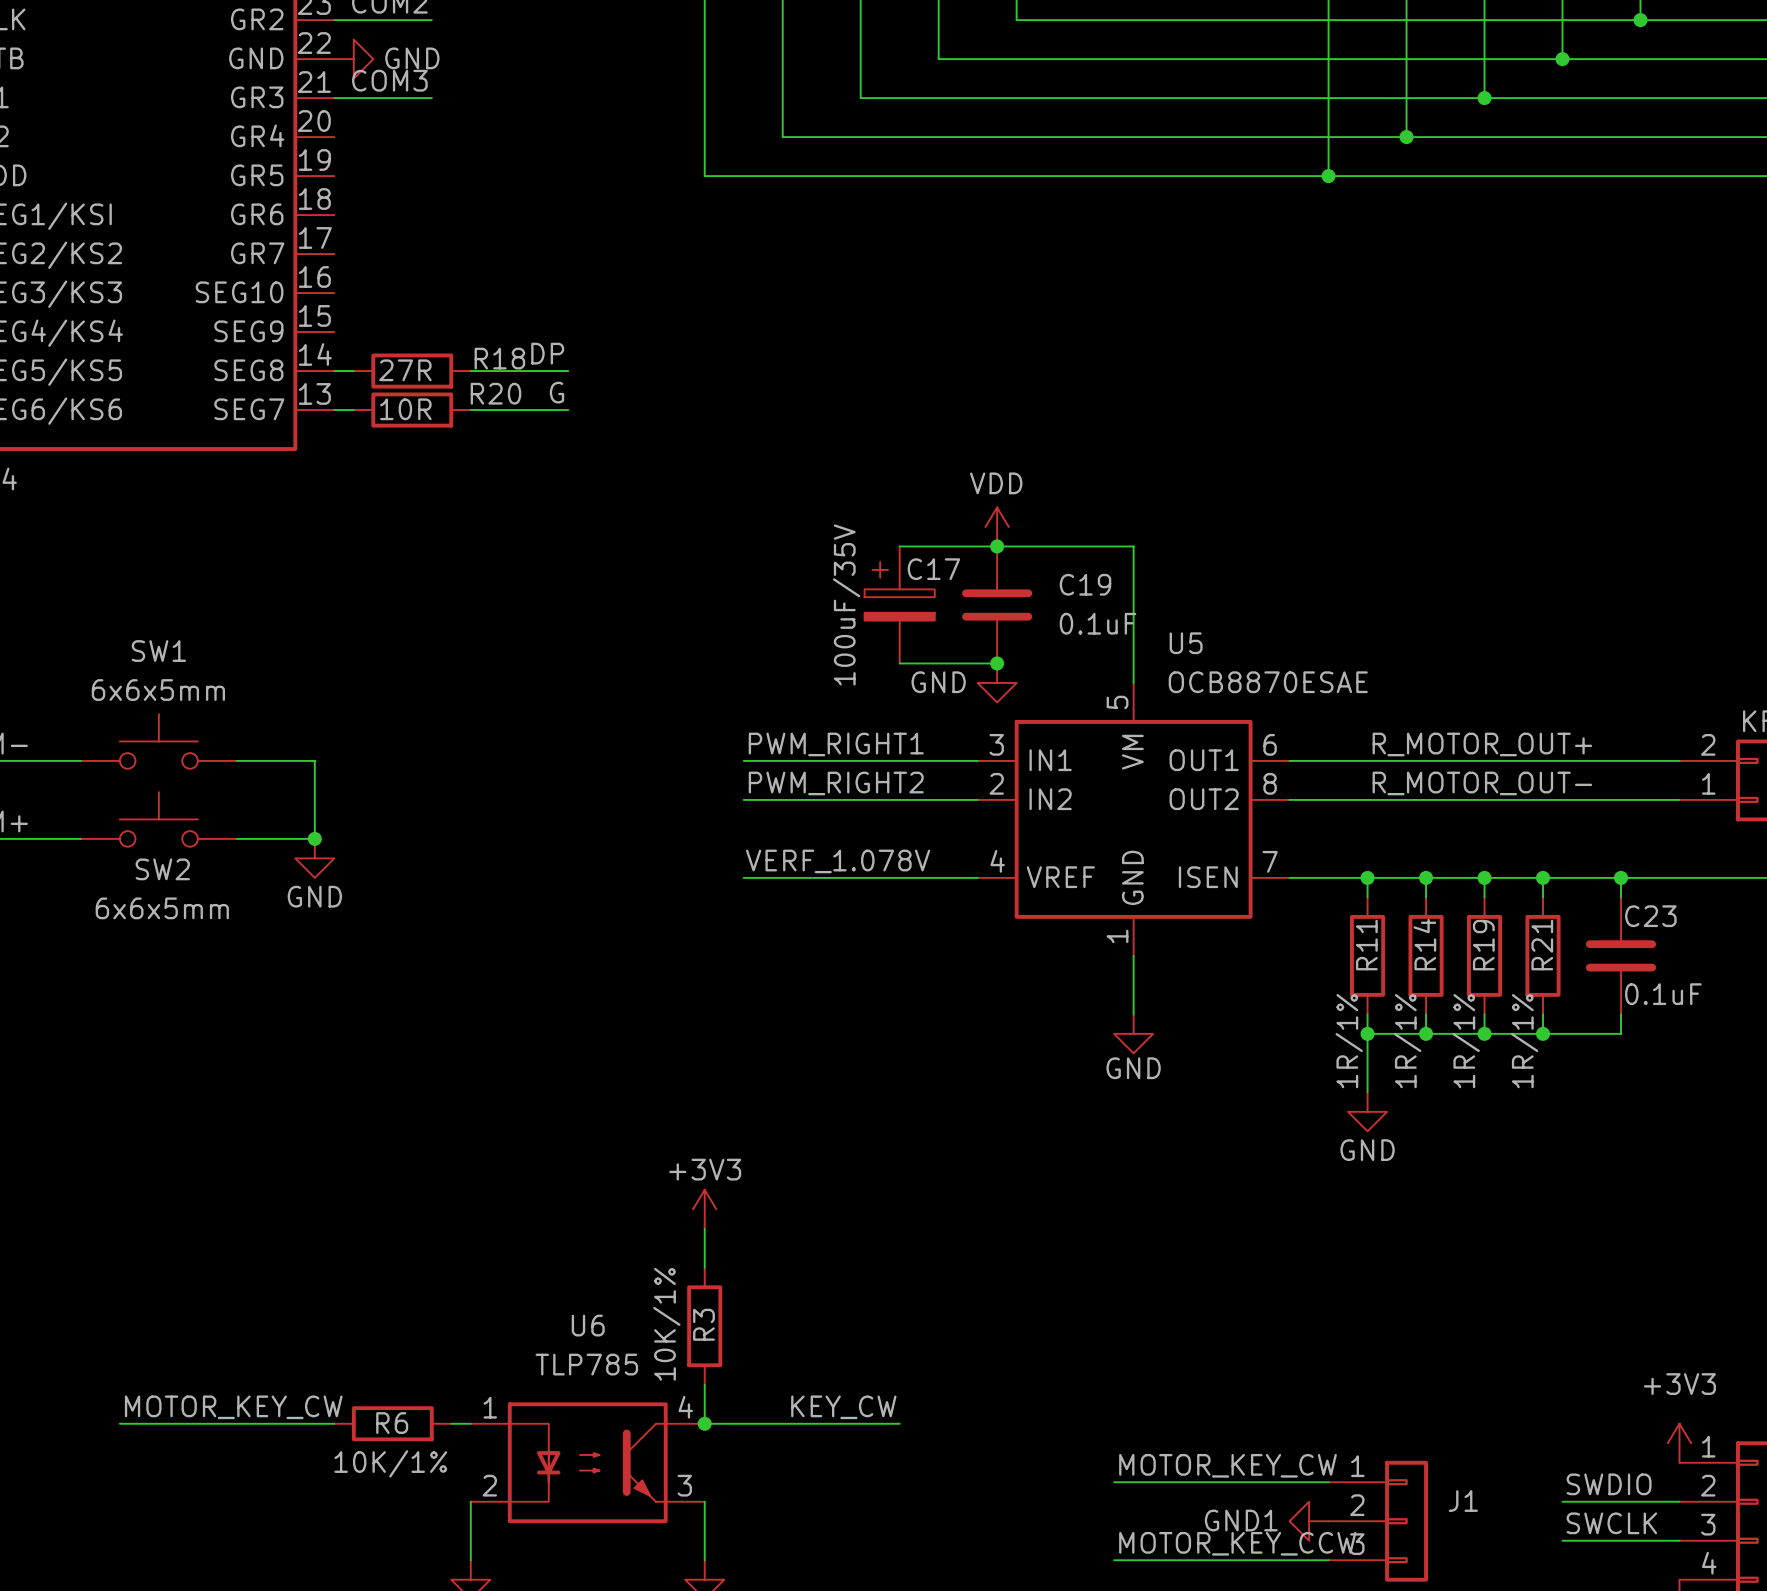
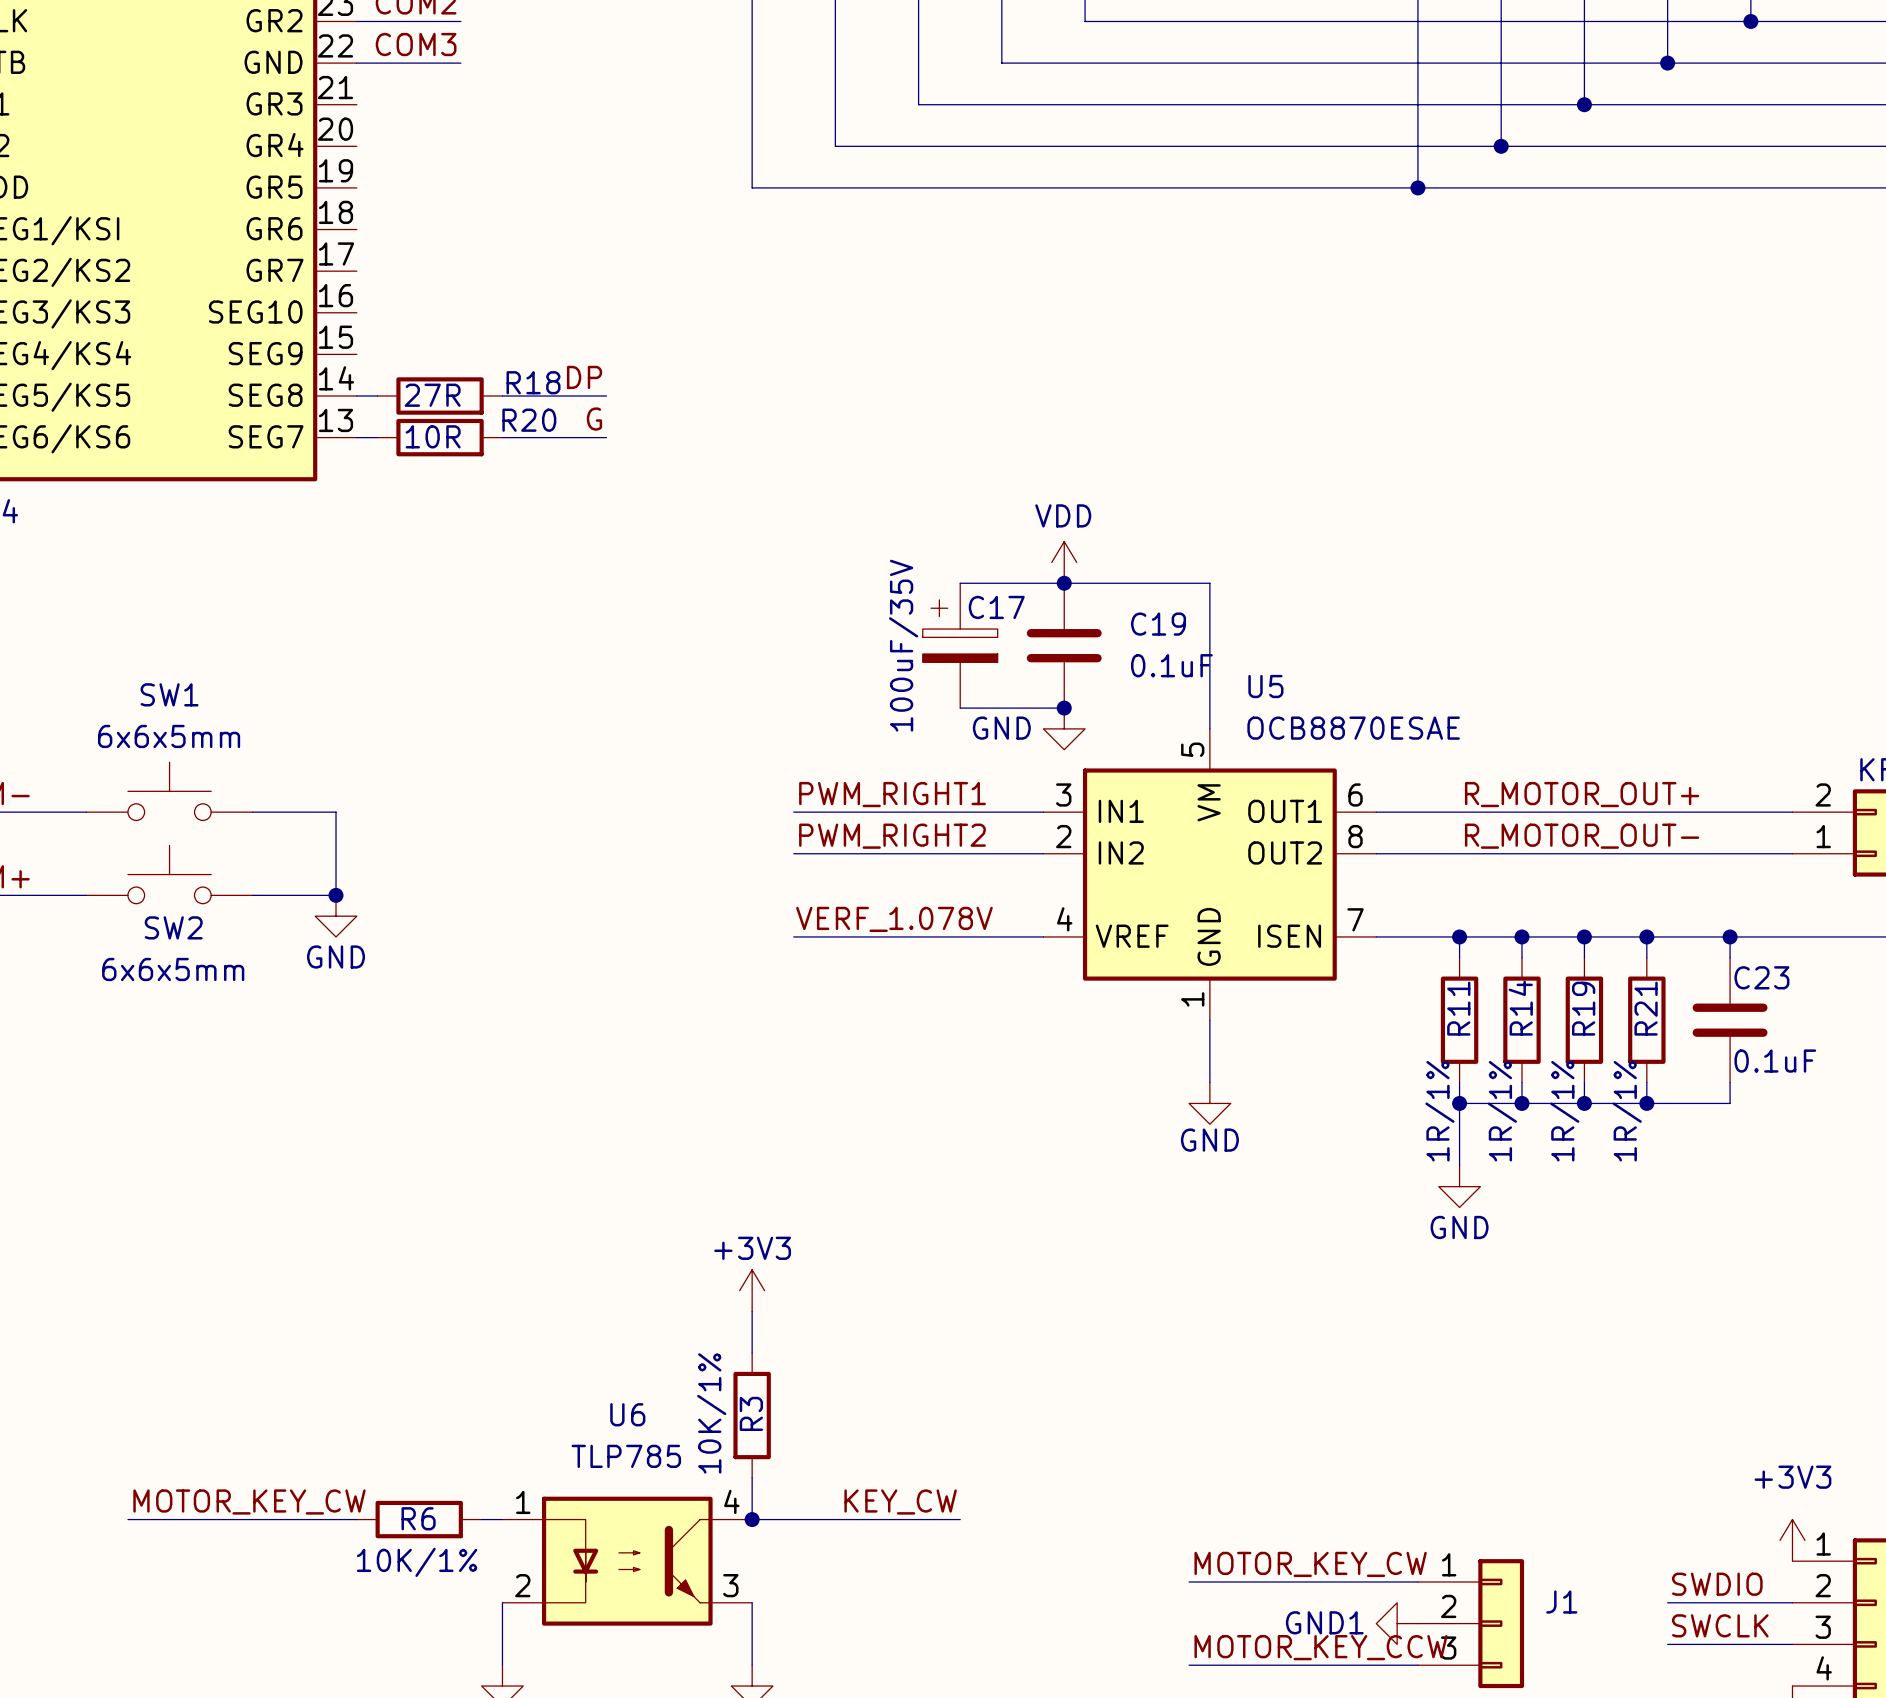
power symbol: GND (353, 59) -> none
label position: COM3 (389, 80) -> COM3 (416, 44)
wire: (334, 98) (431, 98) -> (356, 63) (460, 63)

